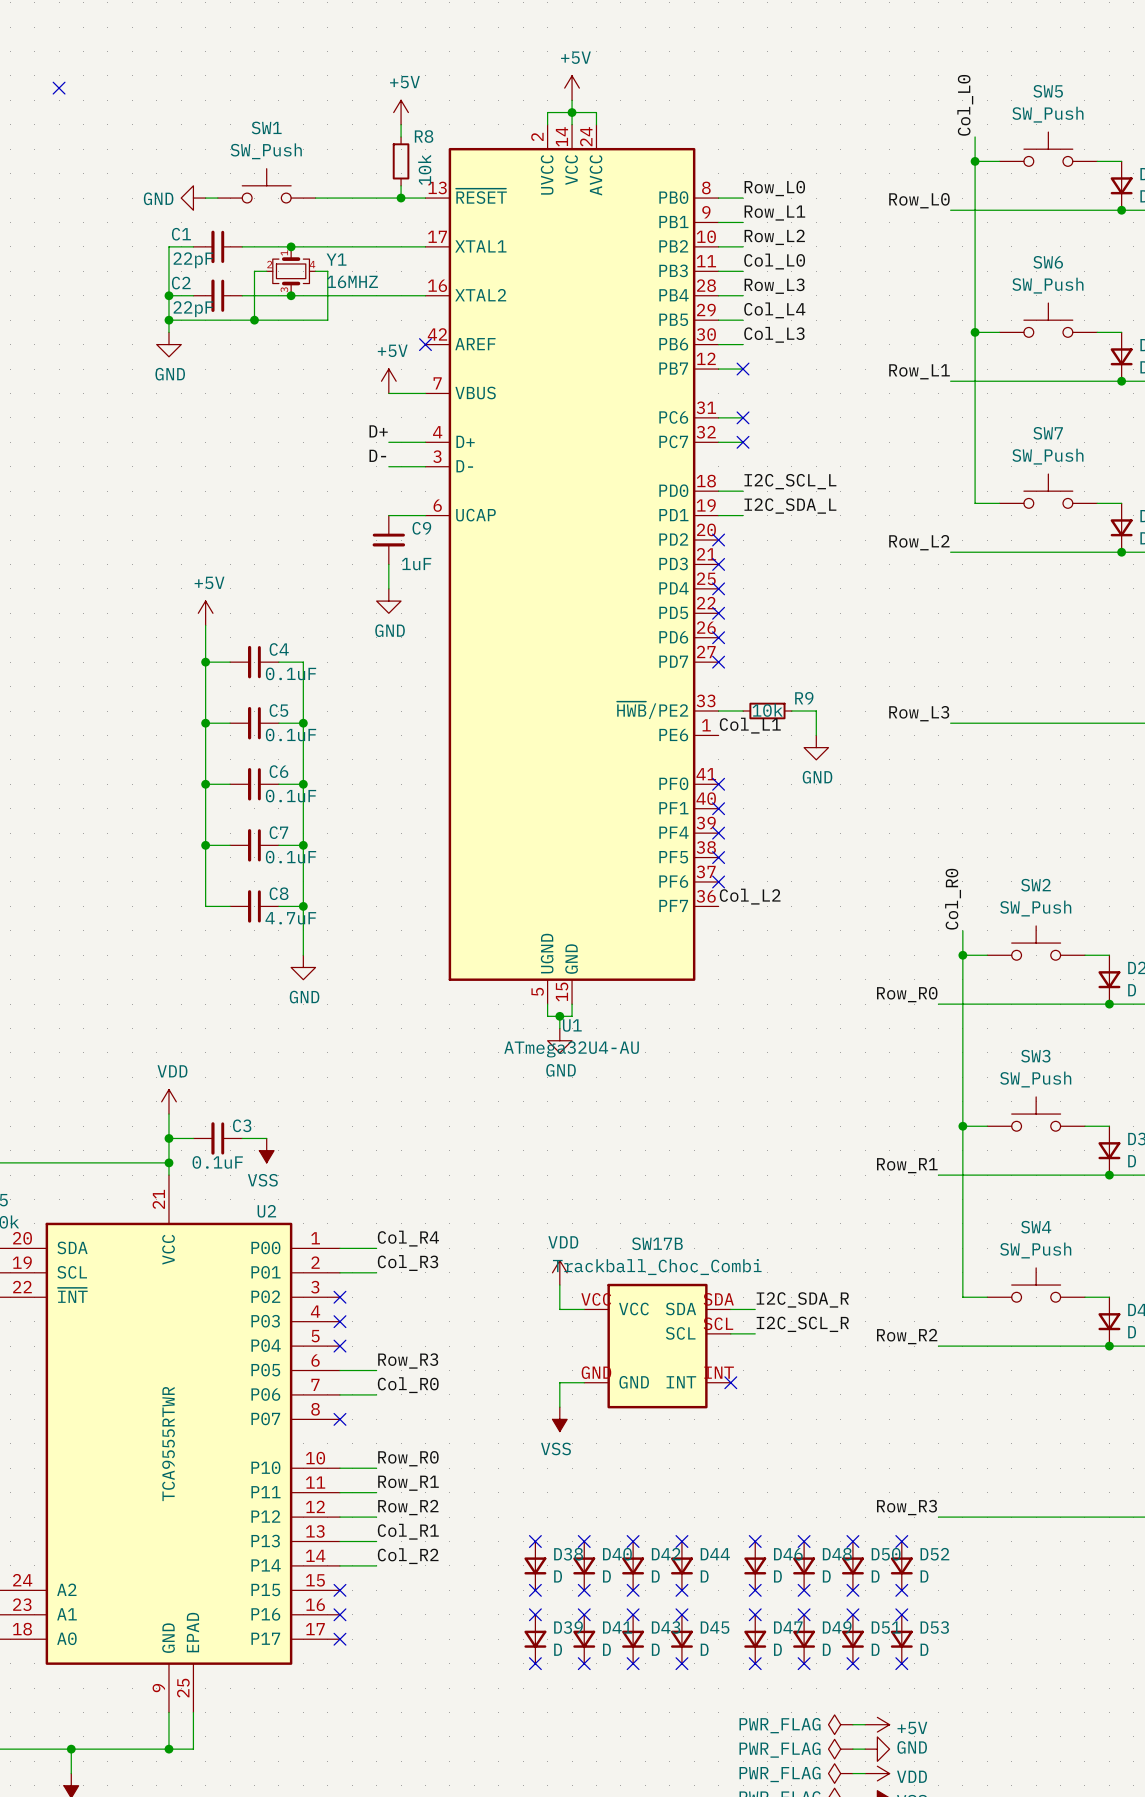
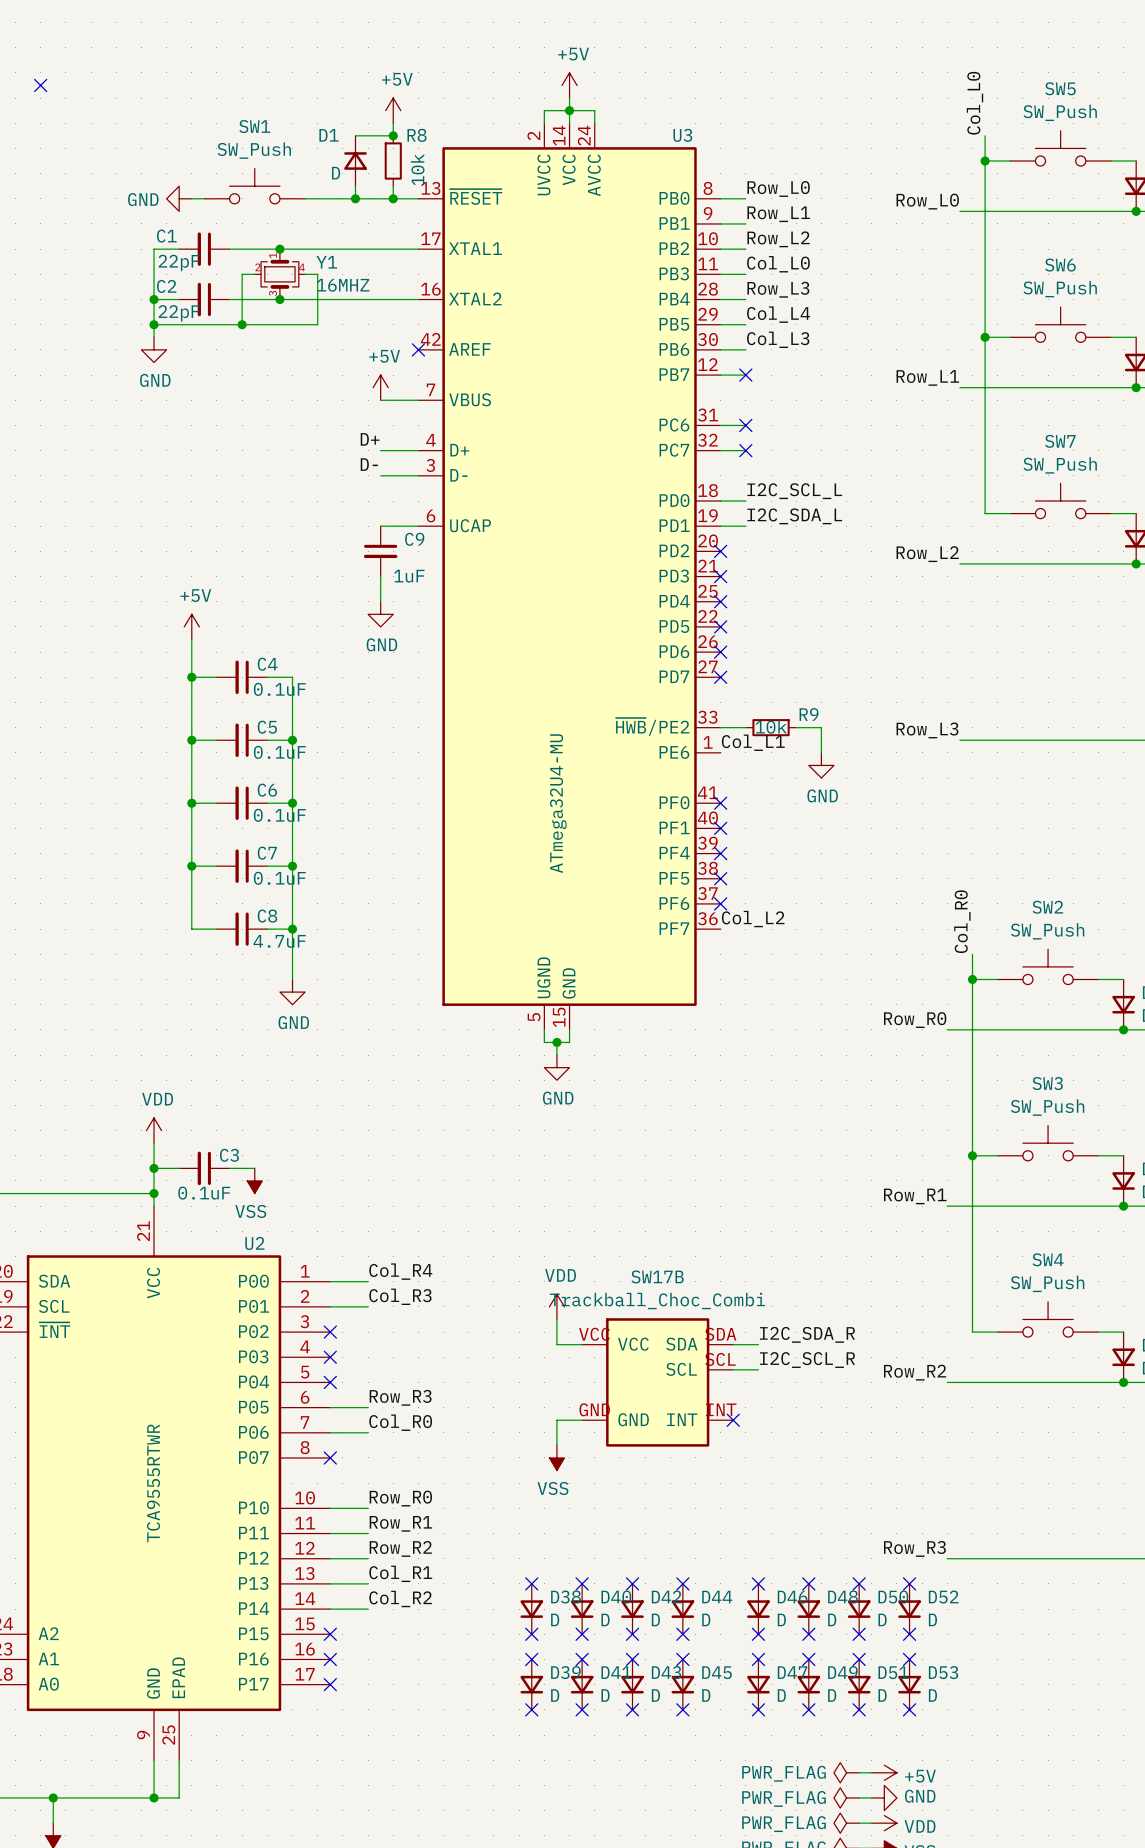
wire: none -> (355, 135) (393, 135)
junction: none -> (393, 135)
D1: none -> D (355, 161)
wire: none -> (355, 186) (355, 198)
junction: none -> (355, 198)
U1 name: U1 (572, 1025) -> U3 (682, 135)
U1 value: ATmega32U4-AU (571, 1049) -> ATmega32U4-MU (558, 803)

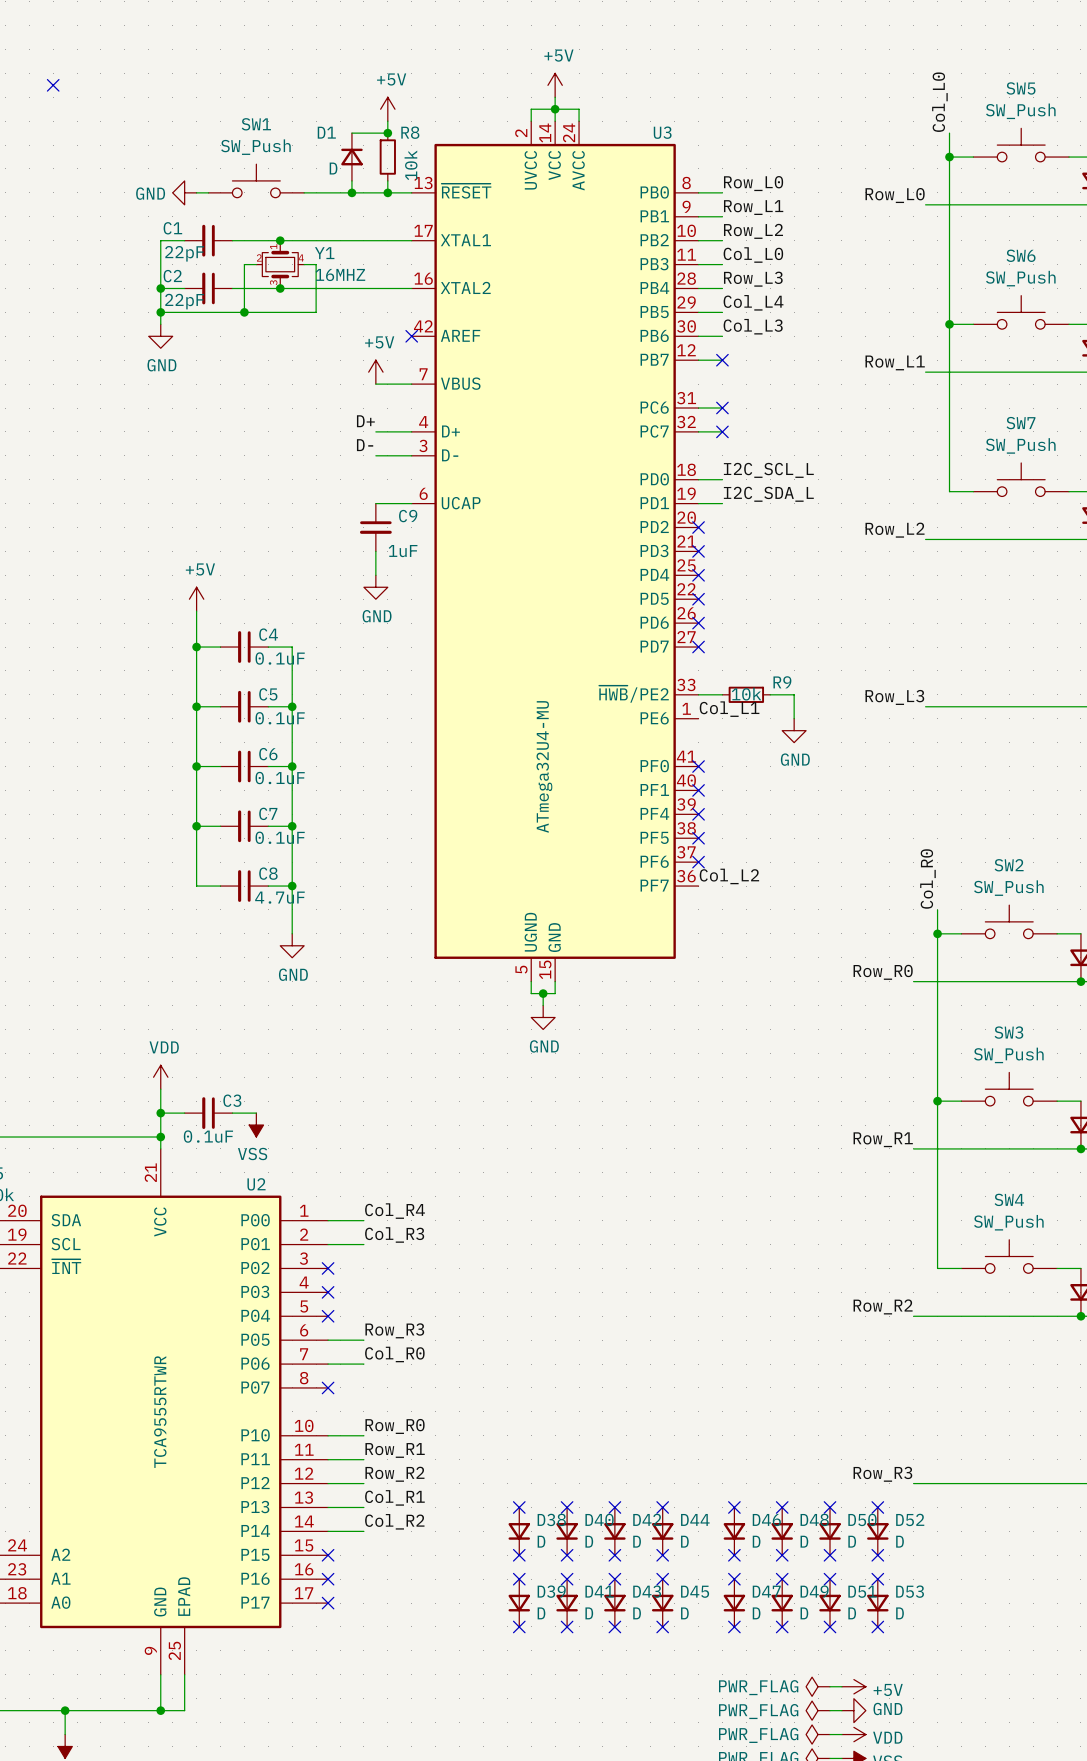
power symbol: VDD (556, 1306) -> none
wire: (556, 1319) (556, 1344) (582, 1344) -> none
label: I2C_SDA_R (807, 1334) -> none
wire: (733, 1344) (758, 1344) -> none
label: I2C_SCL_R (807, 1360) -> none
wire: (733, 1369) (758, 1369) -> none
SW17B: Trackball_Choc_Combi (657, 1382) -> none
wire: (582, 1420) (556, 1420) (556, 1445) -> none
no-connect mark: (733, 1420) -> none
power symbol: VSS (556, 1457) -> none

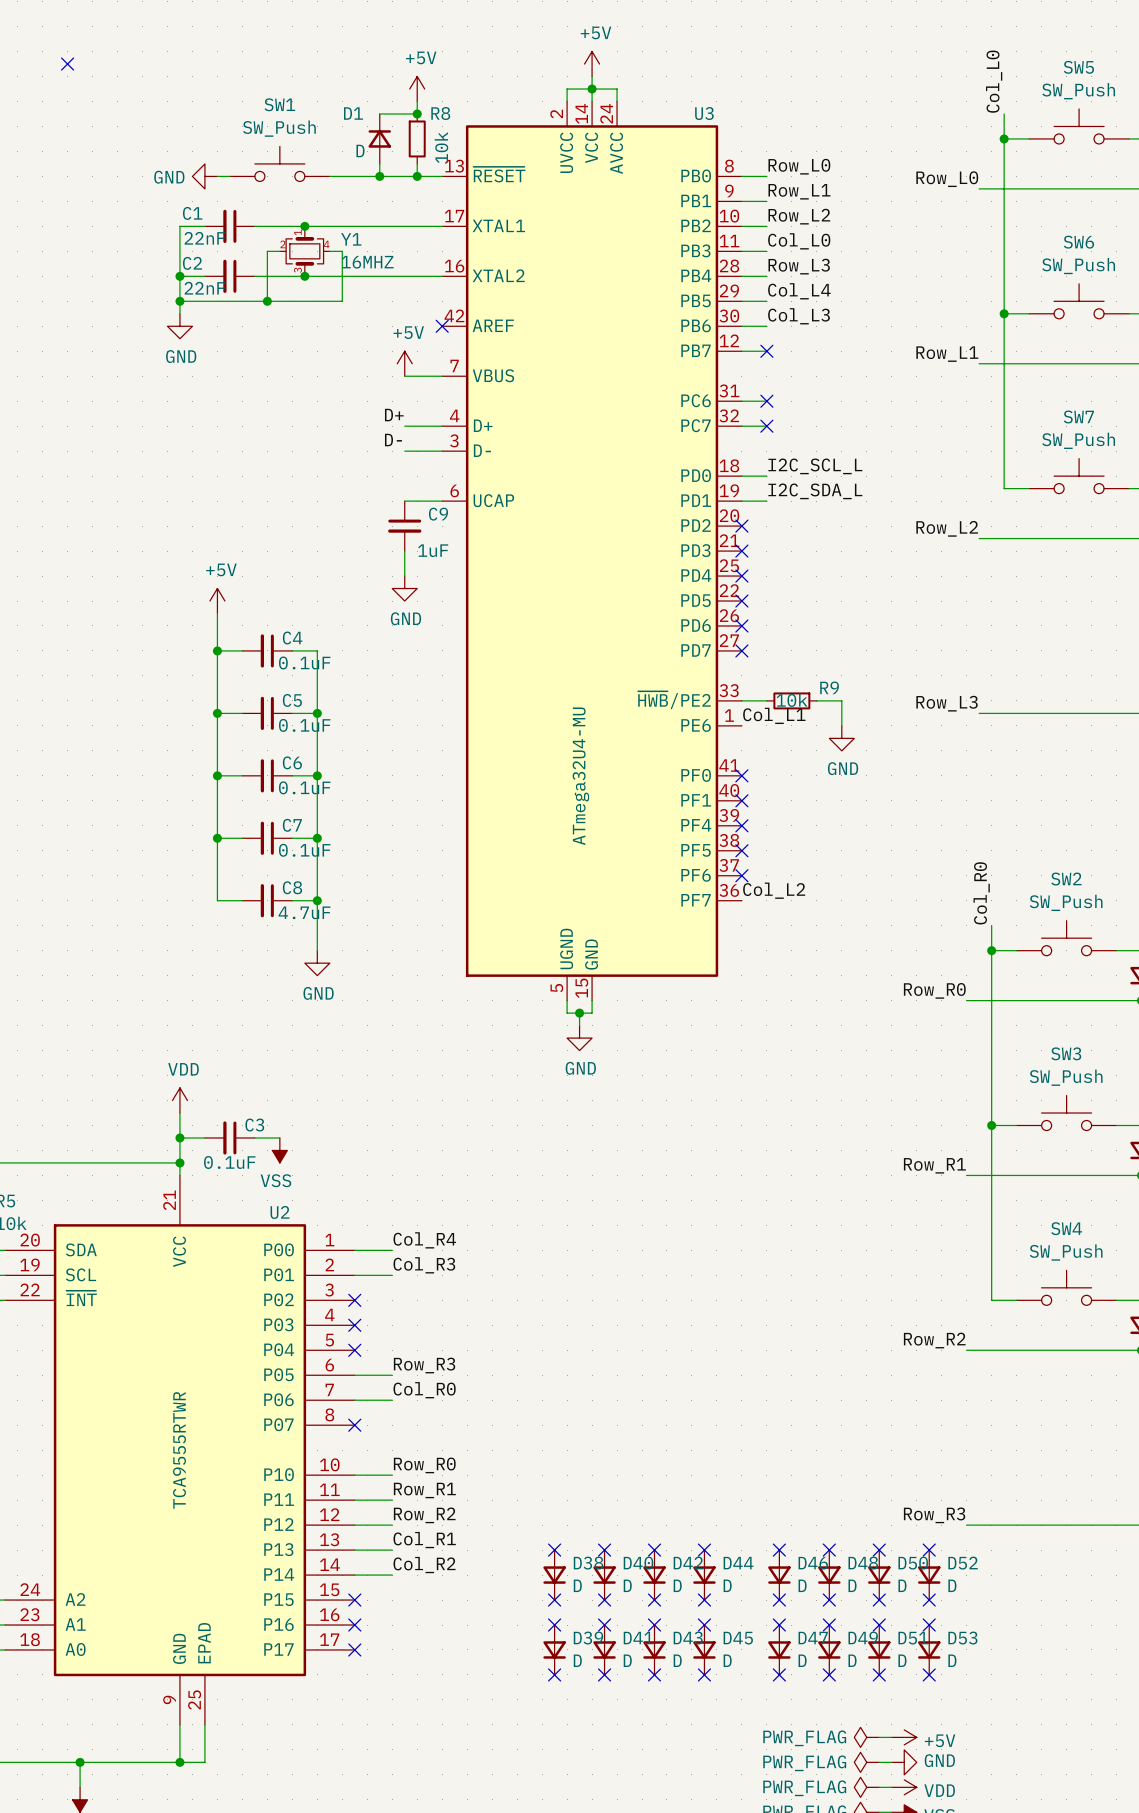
C1 value: 22pF (184, 253) -> 22nF (204, 238)
C2 value: 22pF (184, 301) -> 22nF (204, 288)

